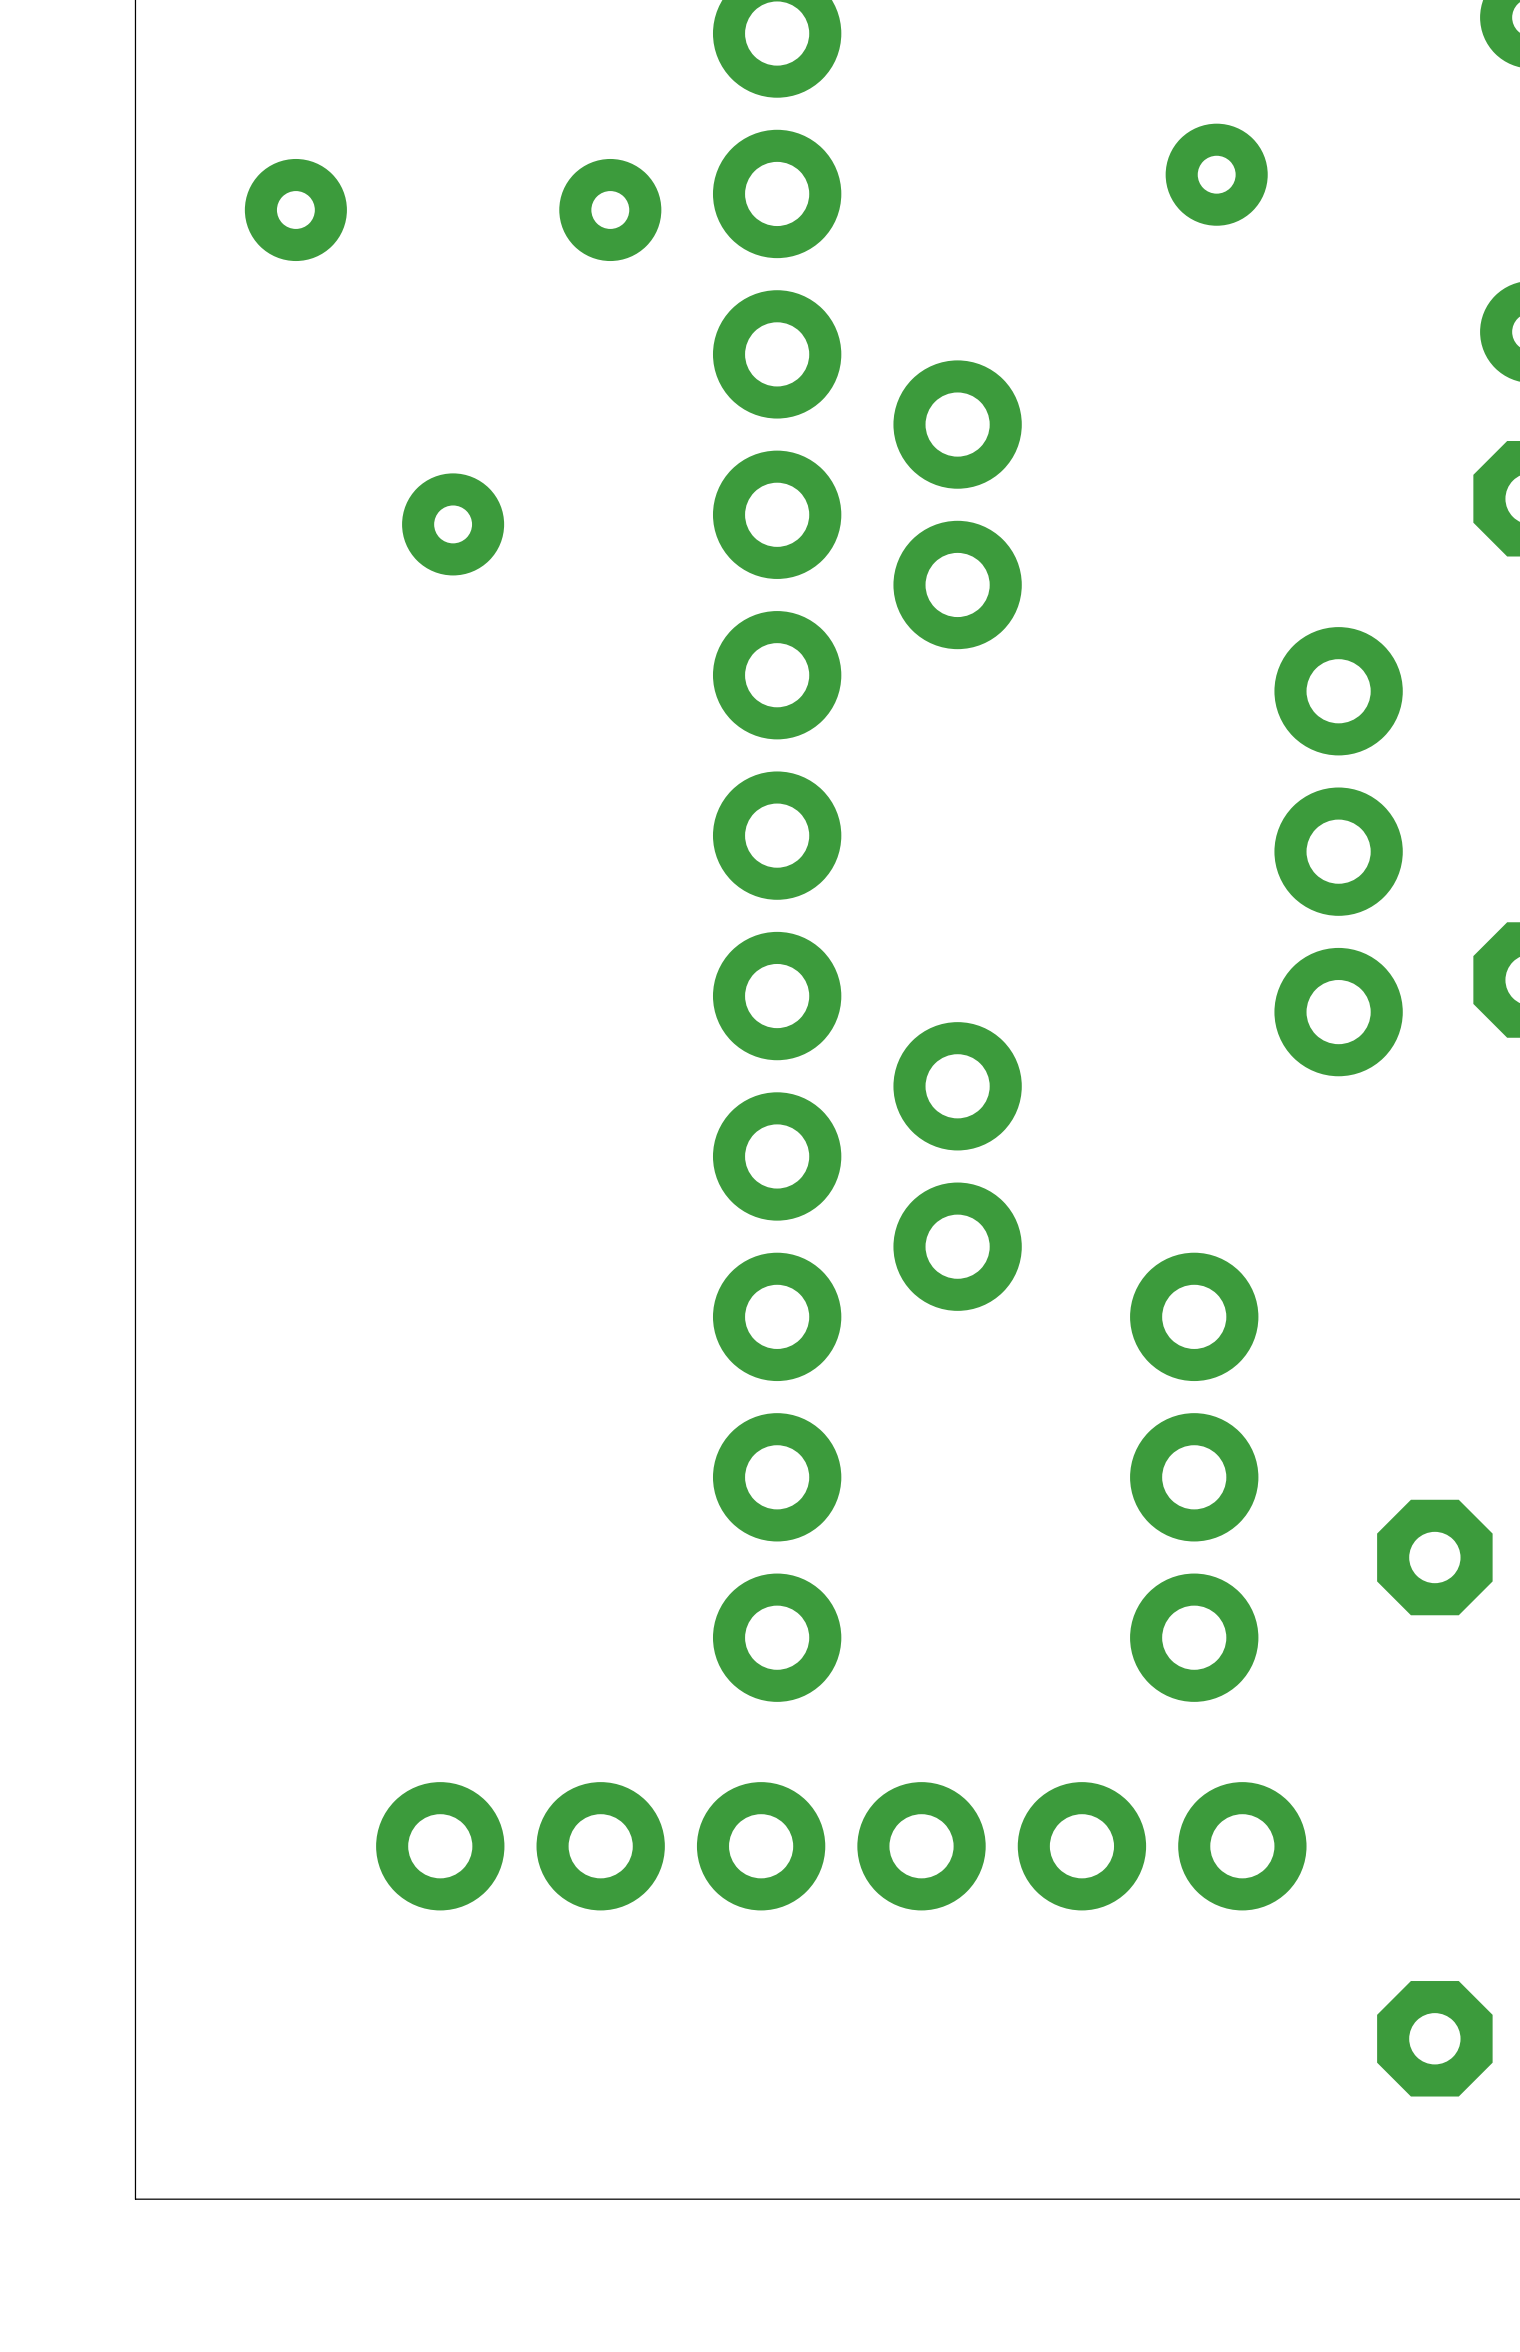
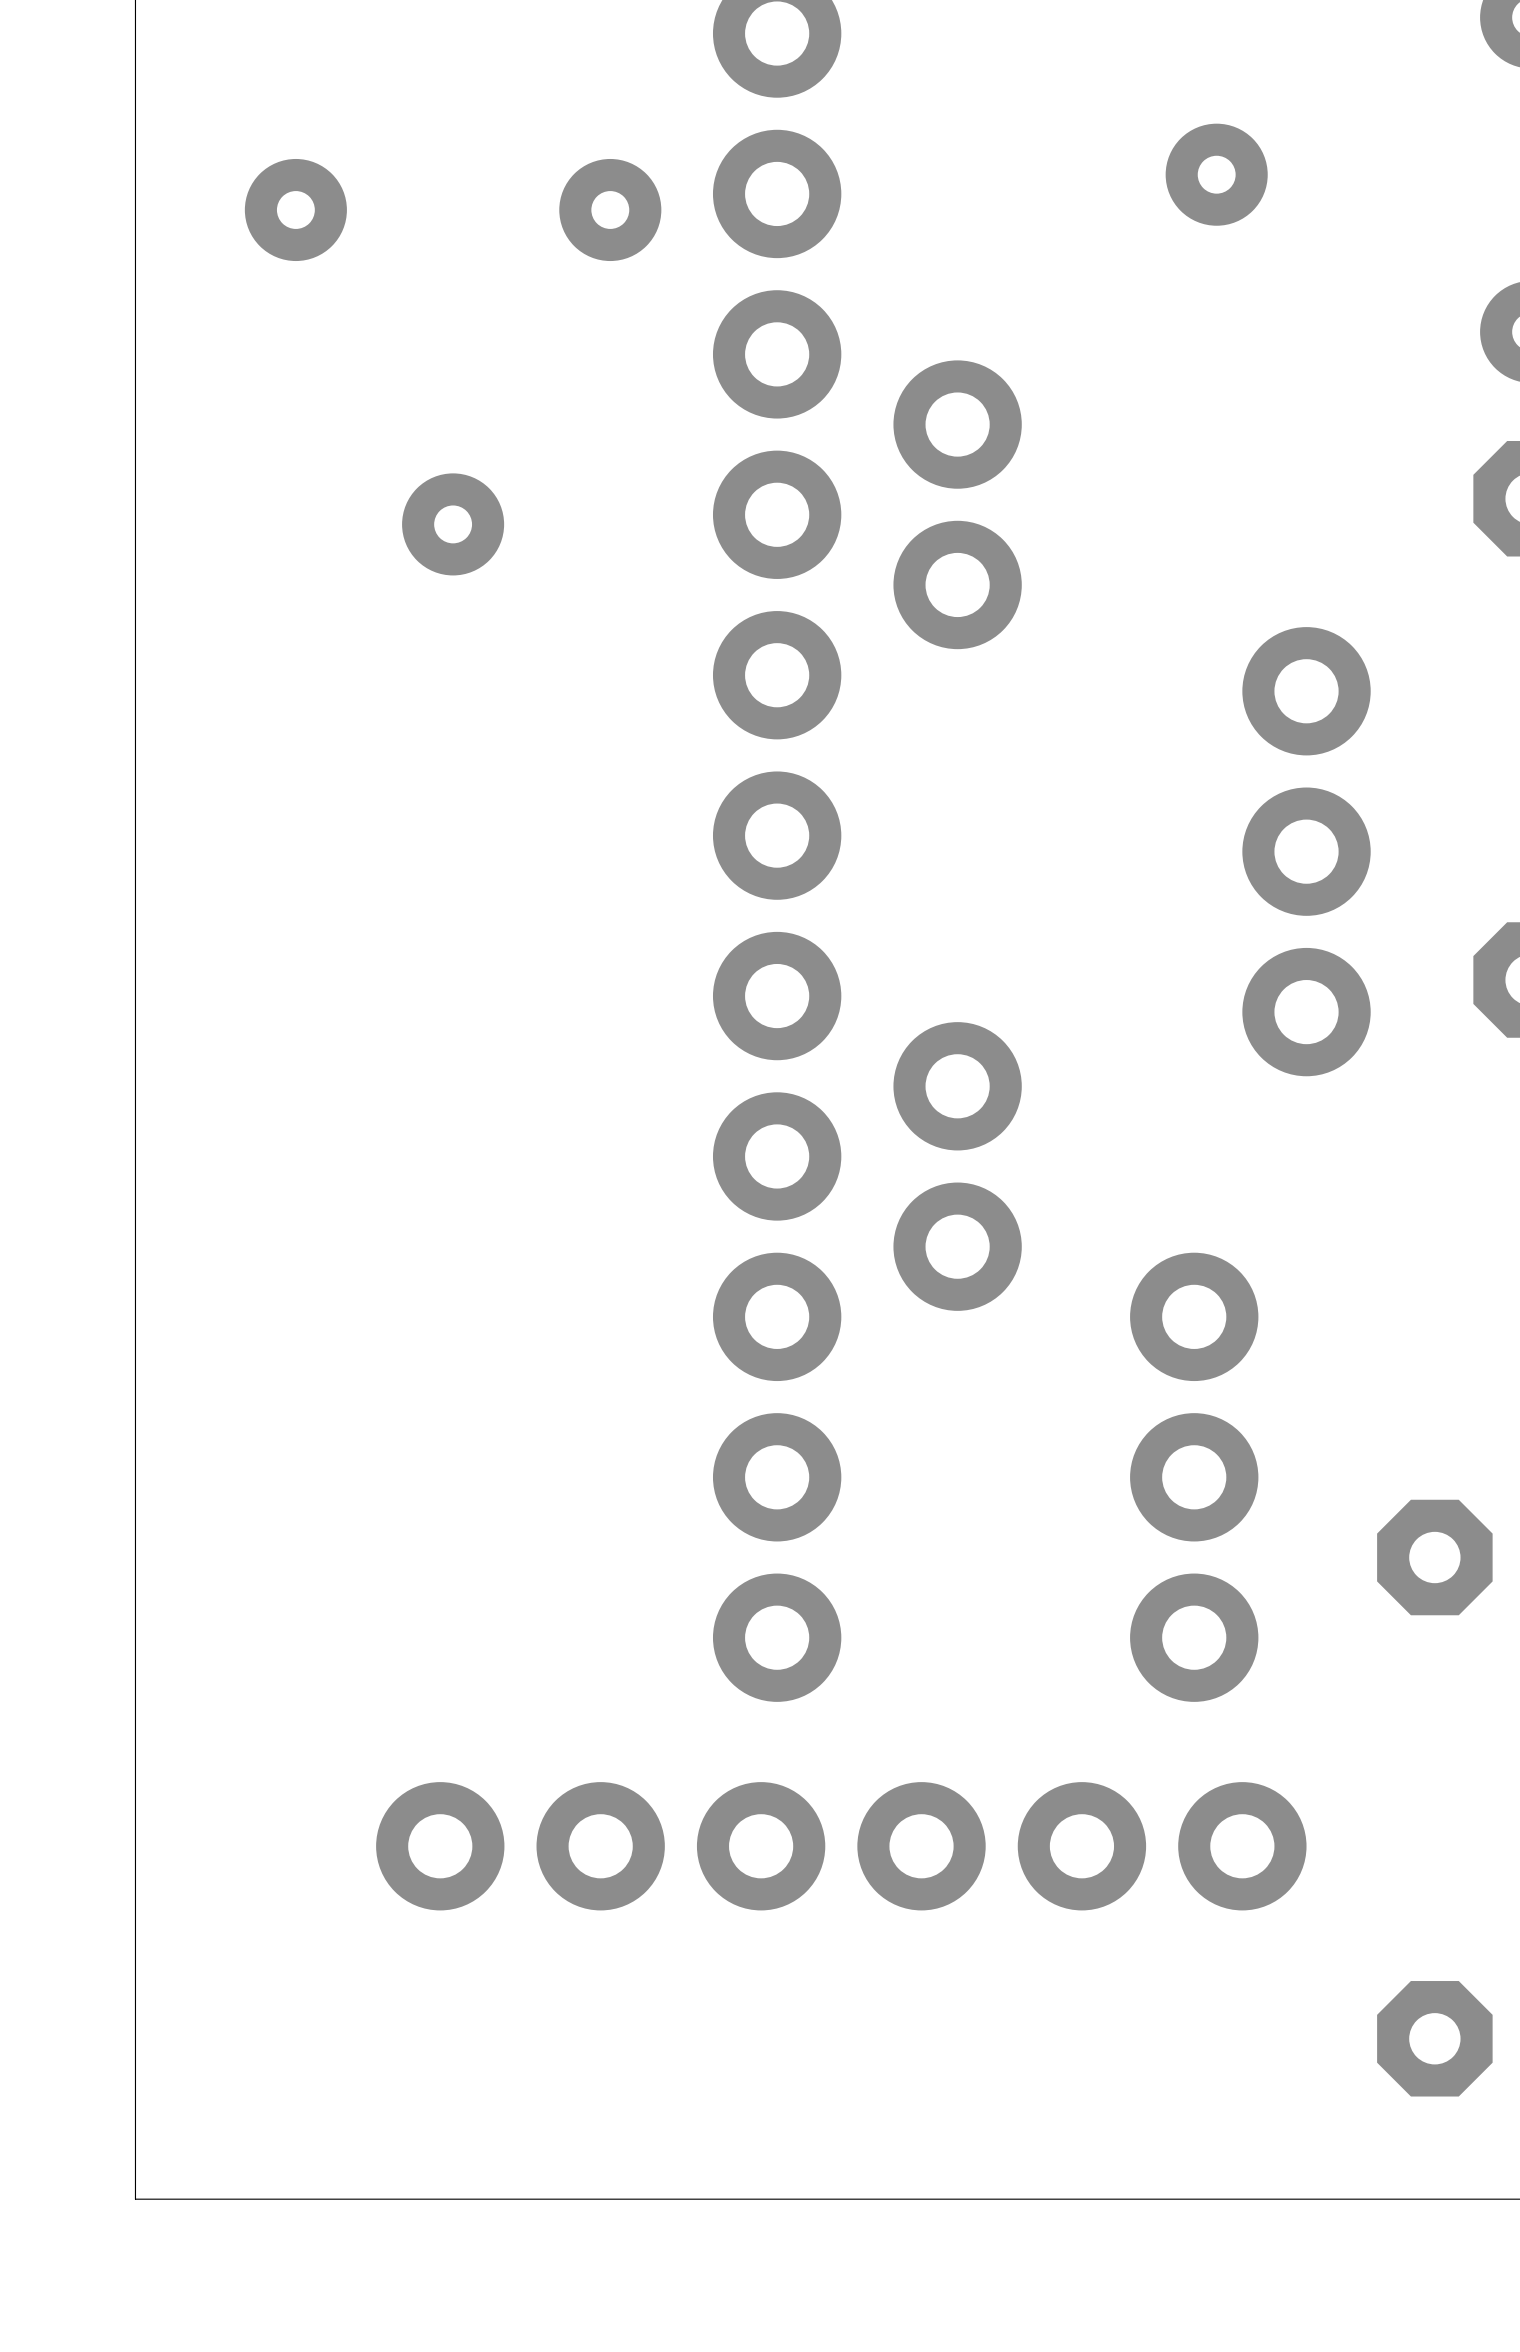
part position: (1338, 851) -> (1306, 851)

